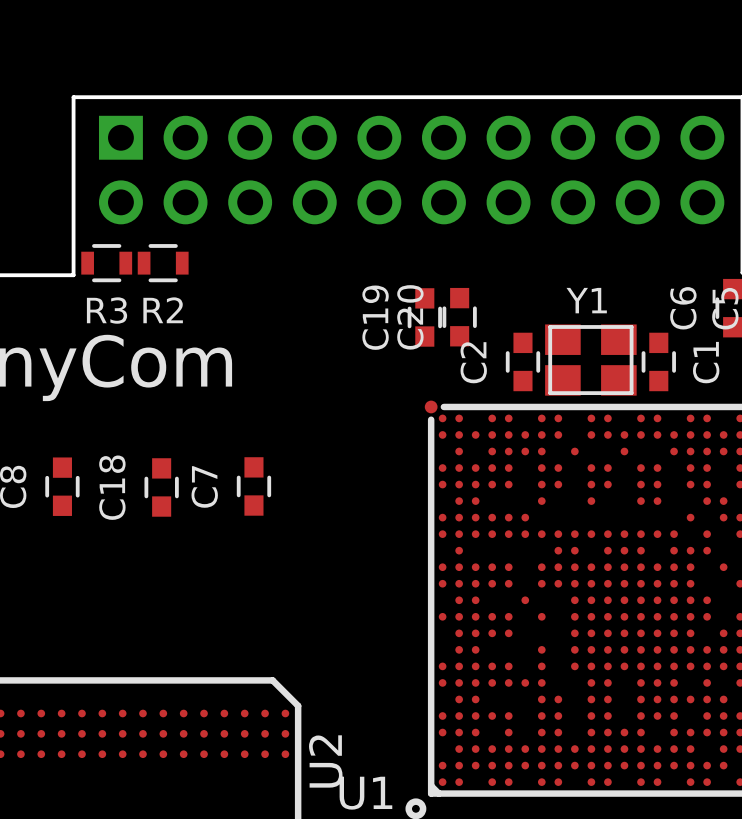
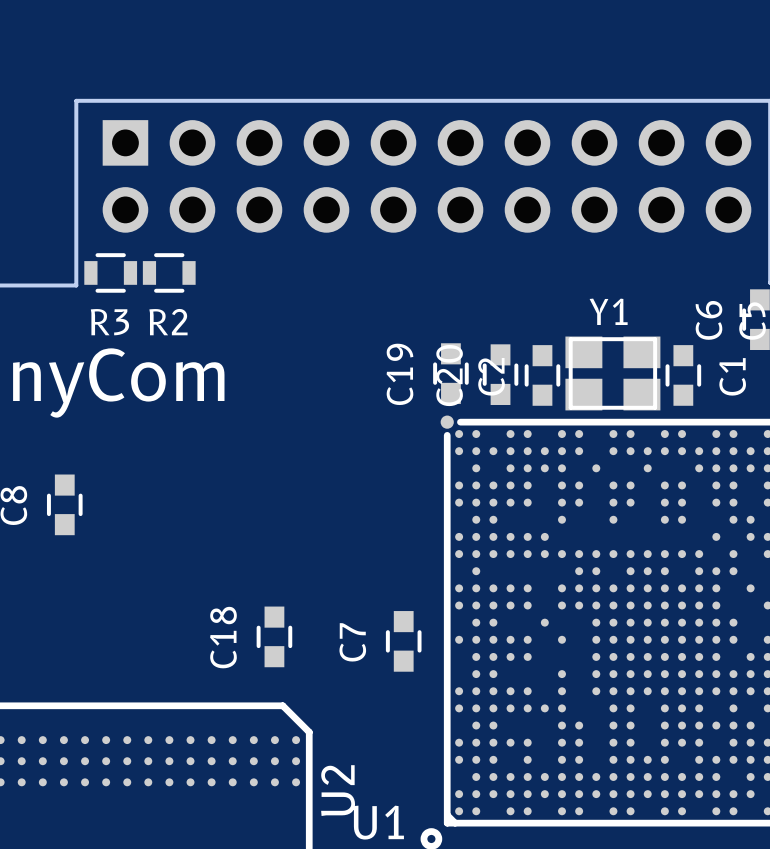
C19 position: (424, 317) -> (450, 373)
C20 position: (459, 317) -> (500, 374)
C7 position: (253, 486) -> (403, 641)
C18 position: (161, 487) -> (274, 636)

